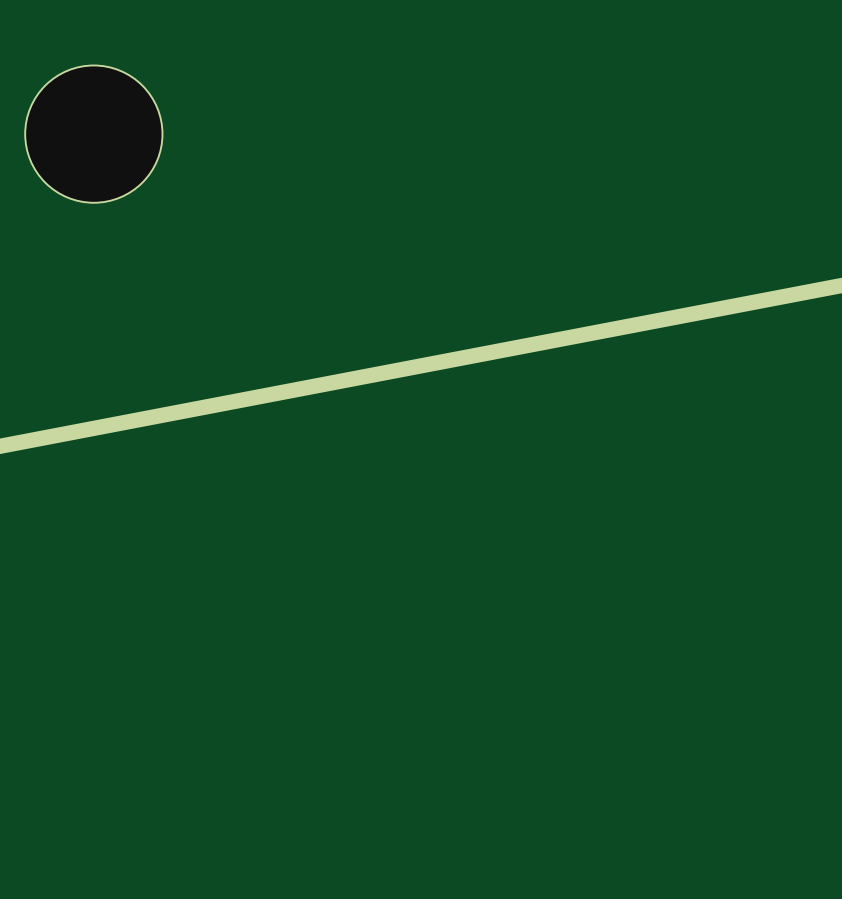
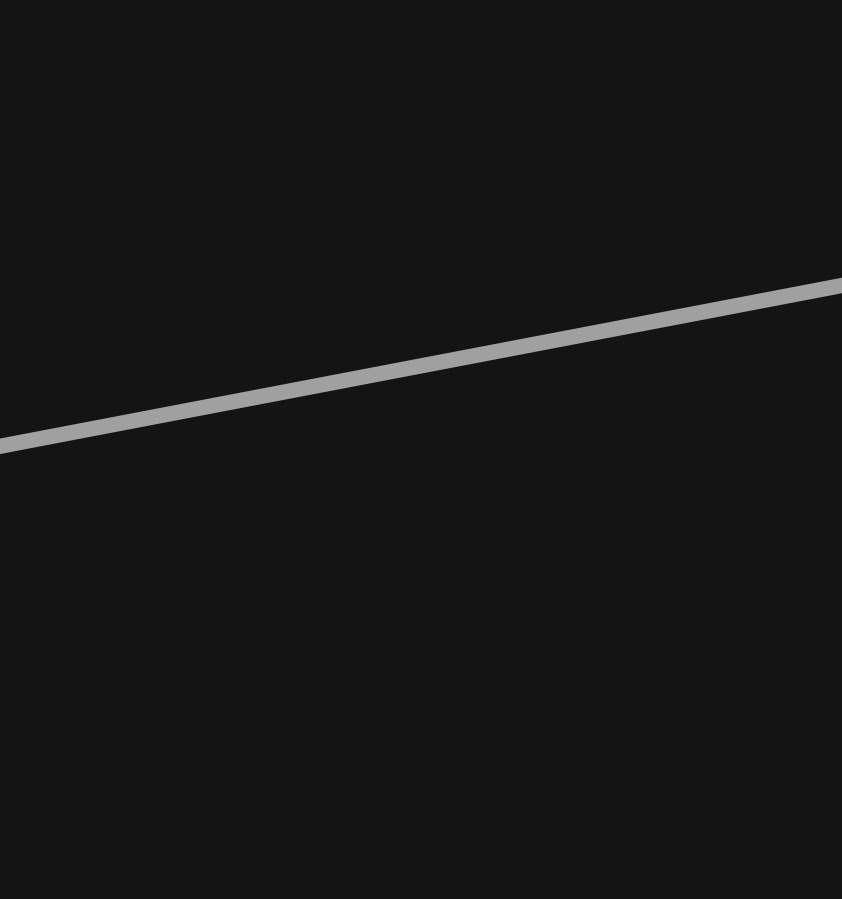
part: (93, 134) -> none

